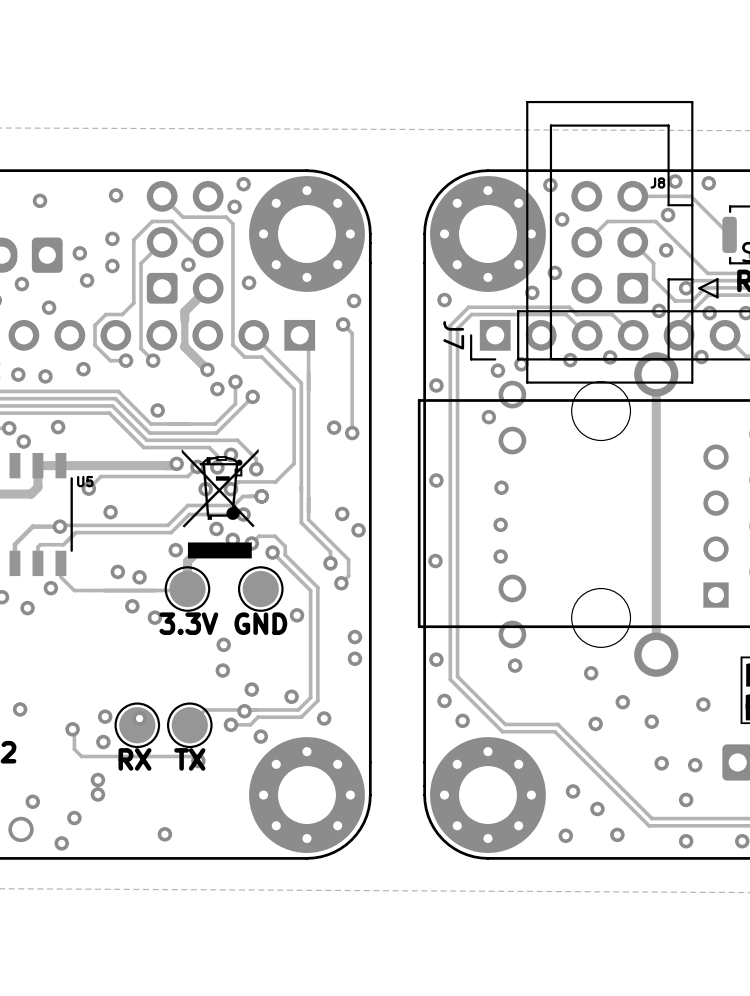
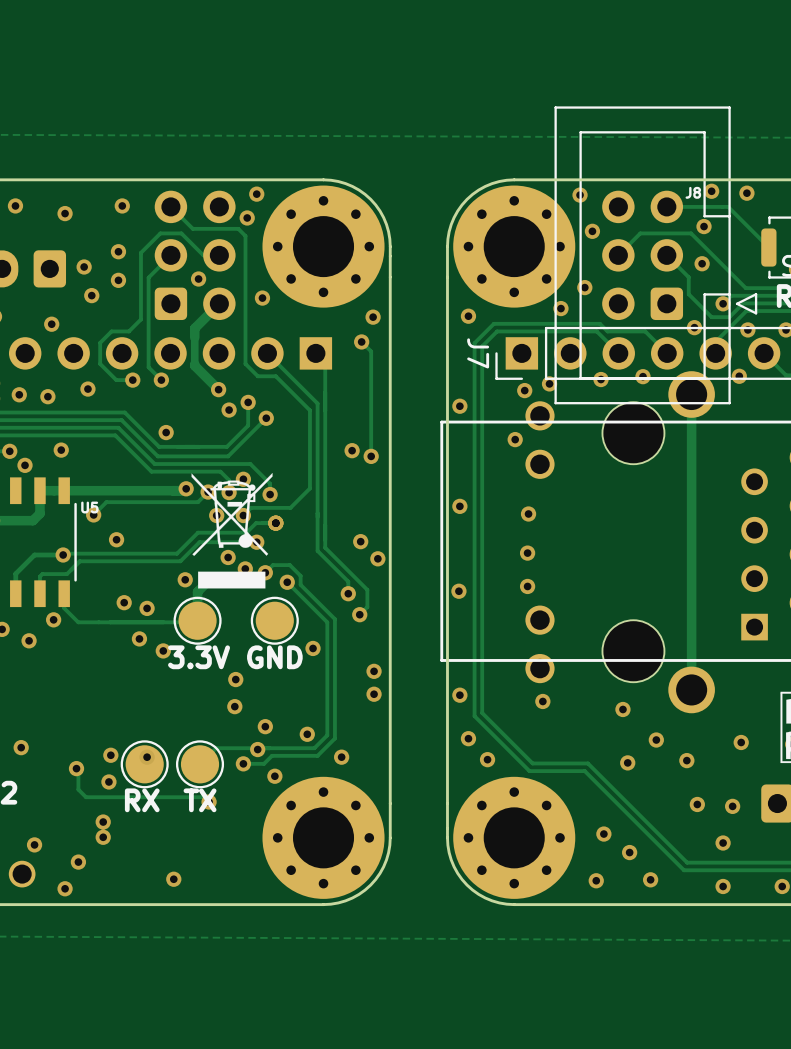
via: none -> (15, 205)
via: (40, 200) -> none
via: none -> (65, 213)
via: (21, 284) -> none

